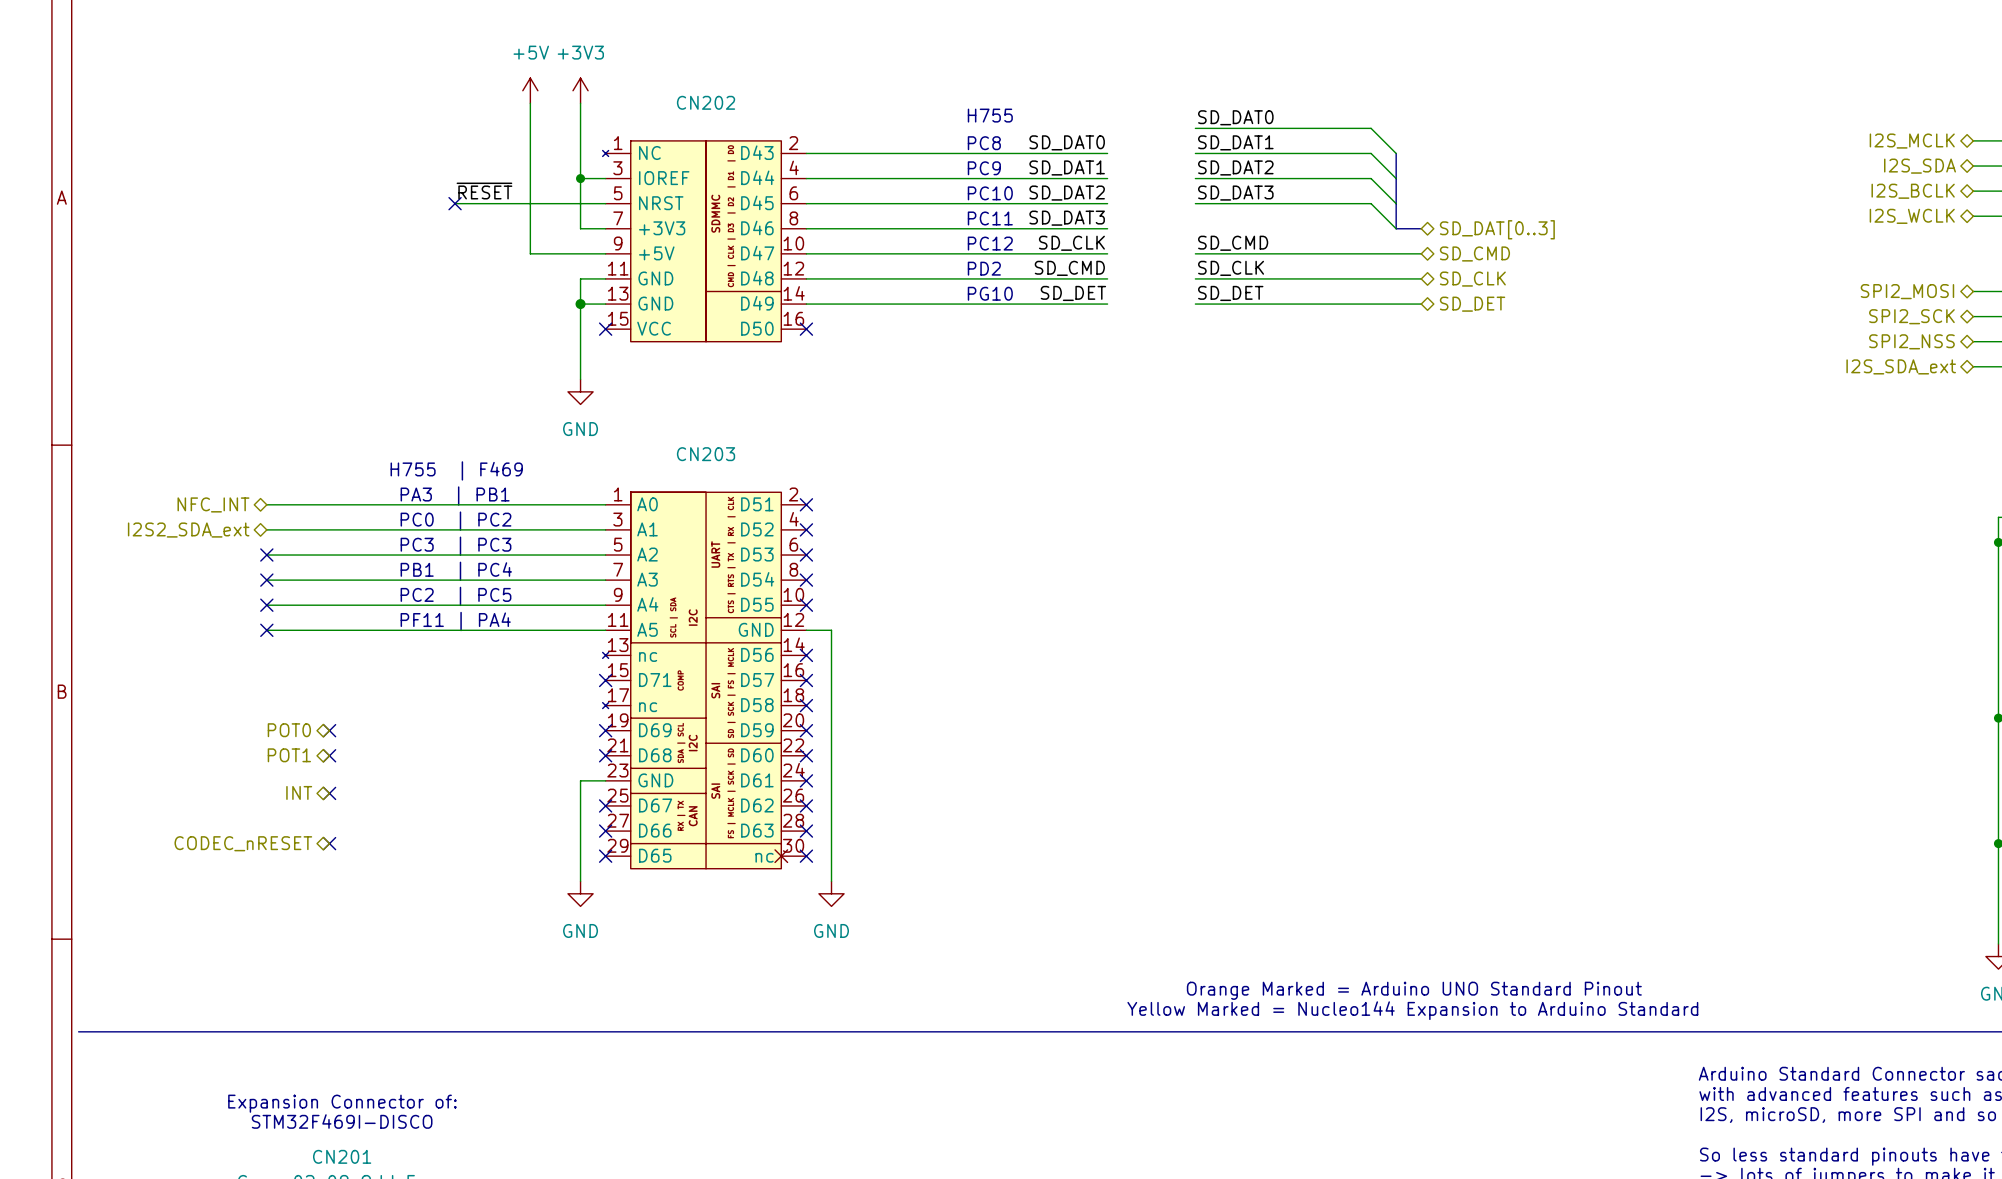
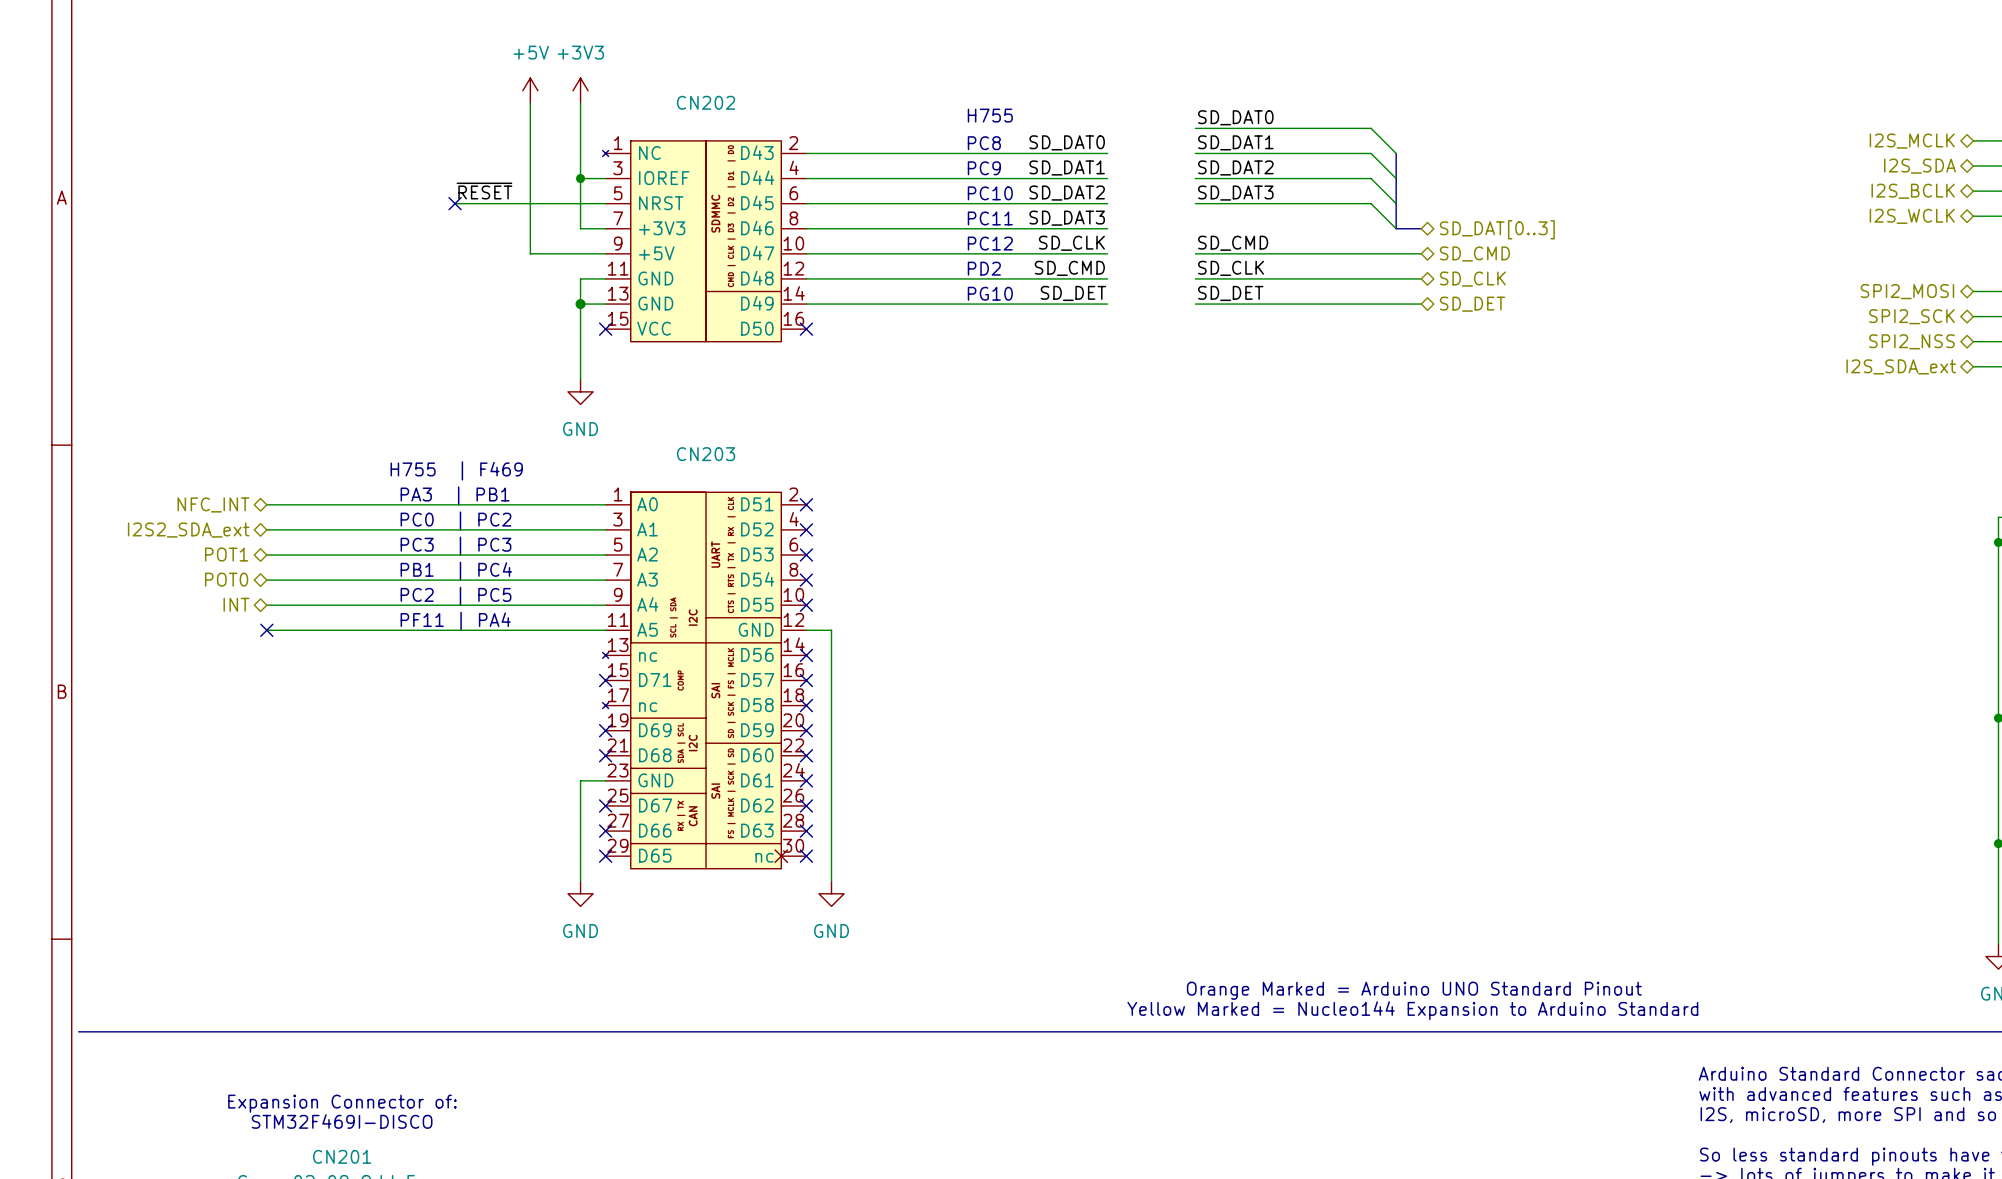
no-connect mark: (266, 555) -> none
no-connect mark: (266, 580) -> none
no-connect mark: (266, 605) -> none
hierarchical label position: POT0 (289, 730) -> POT0 (226, 579)
no-connect mark: (329, 730) -> none
hierarchical label position: POT1 (289, 755) -> POT1 (226, 554)
no-connect mark: (329, 755) -> none
hierarchical label position: INT (299, 792) -> INT (236, 604)
no-connect mark: (329, 793) -> none
hierarchical label: CODEC_nRESET (243, 843) -> none
no-connect mark: (329, 843) -> none

